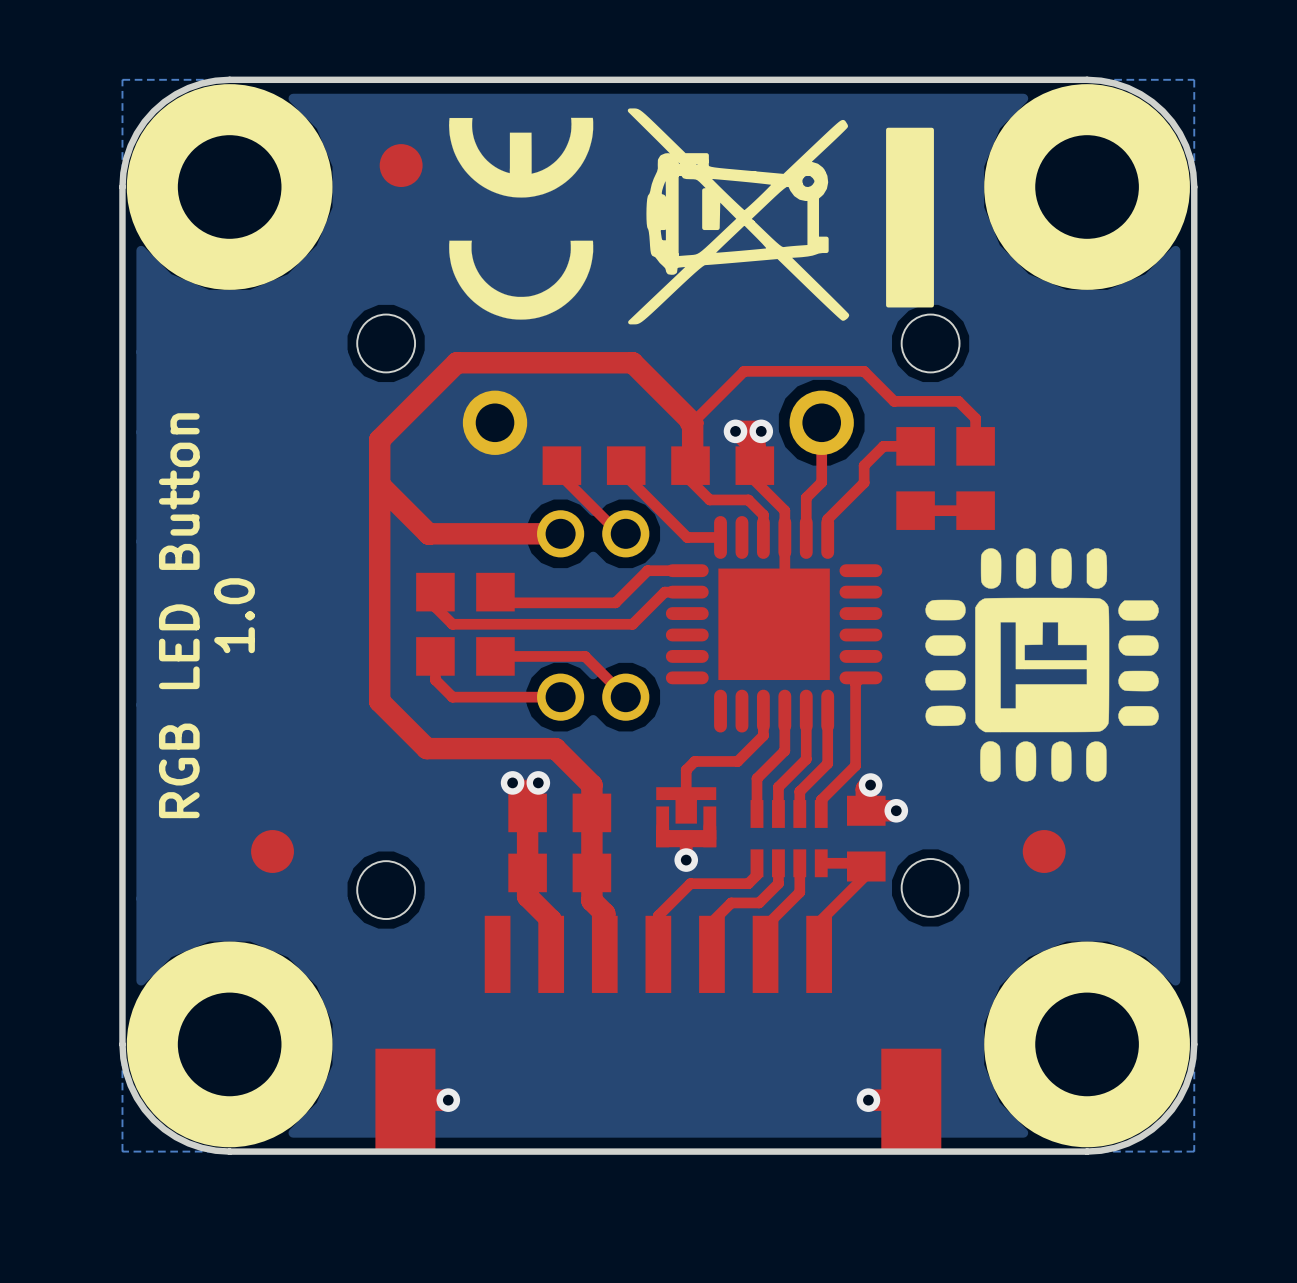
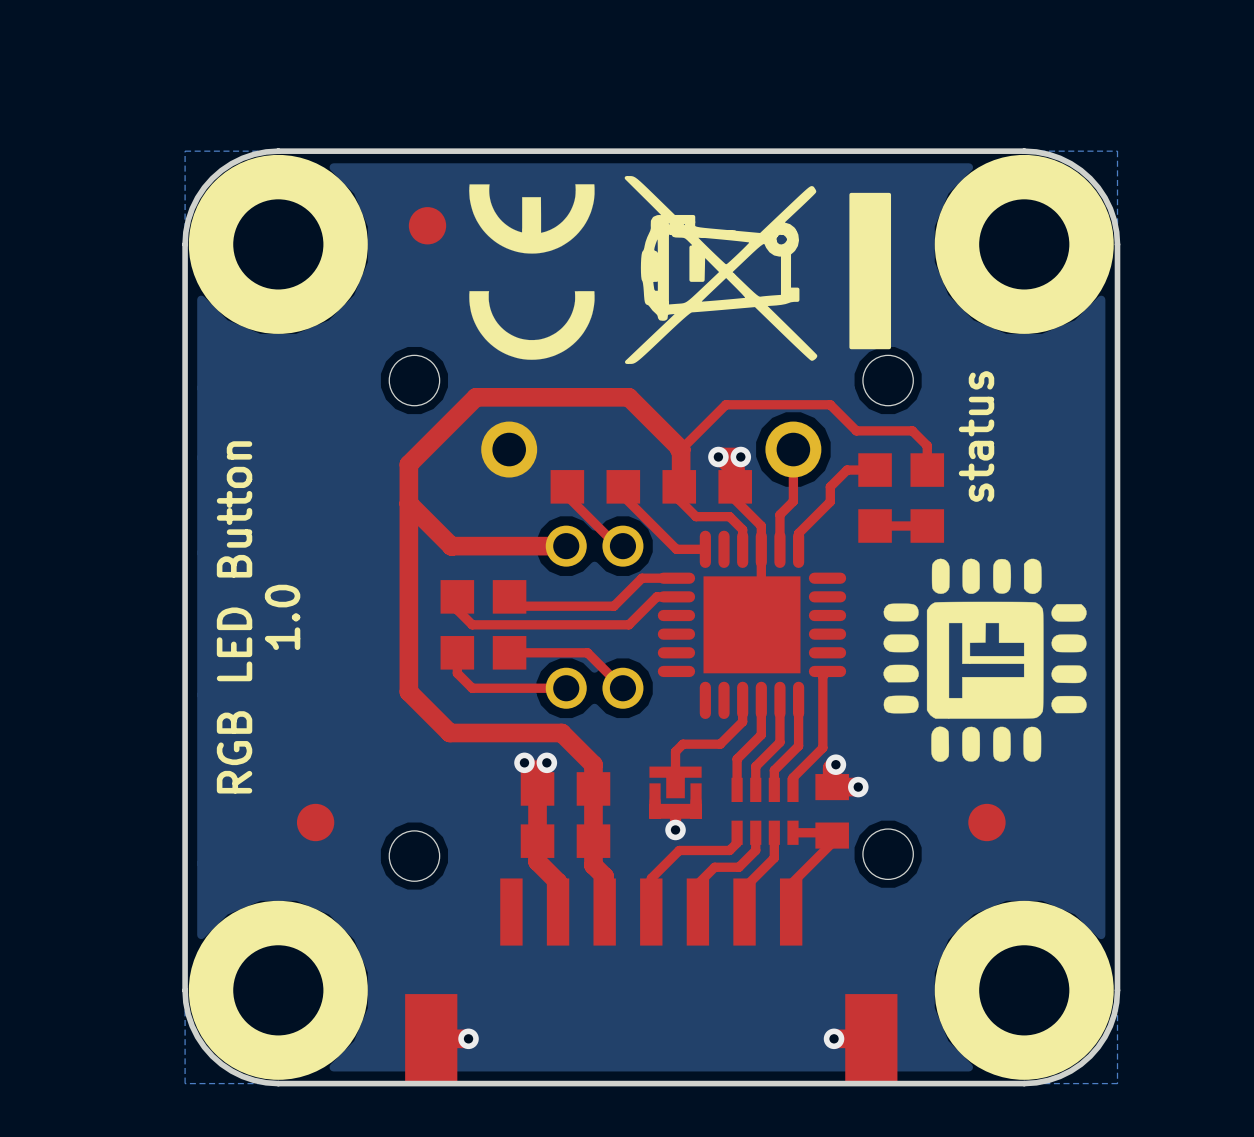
text: none -> status (976, 436)

